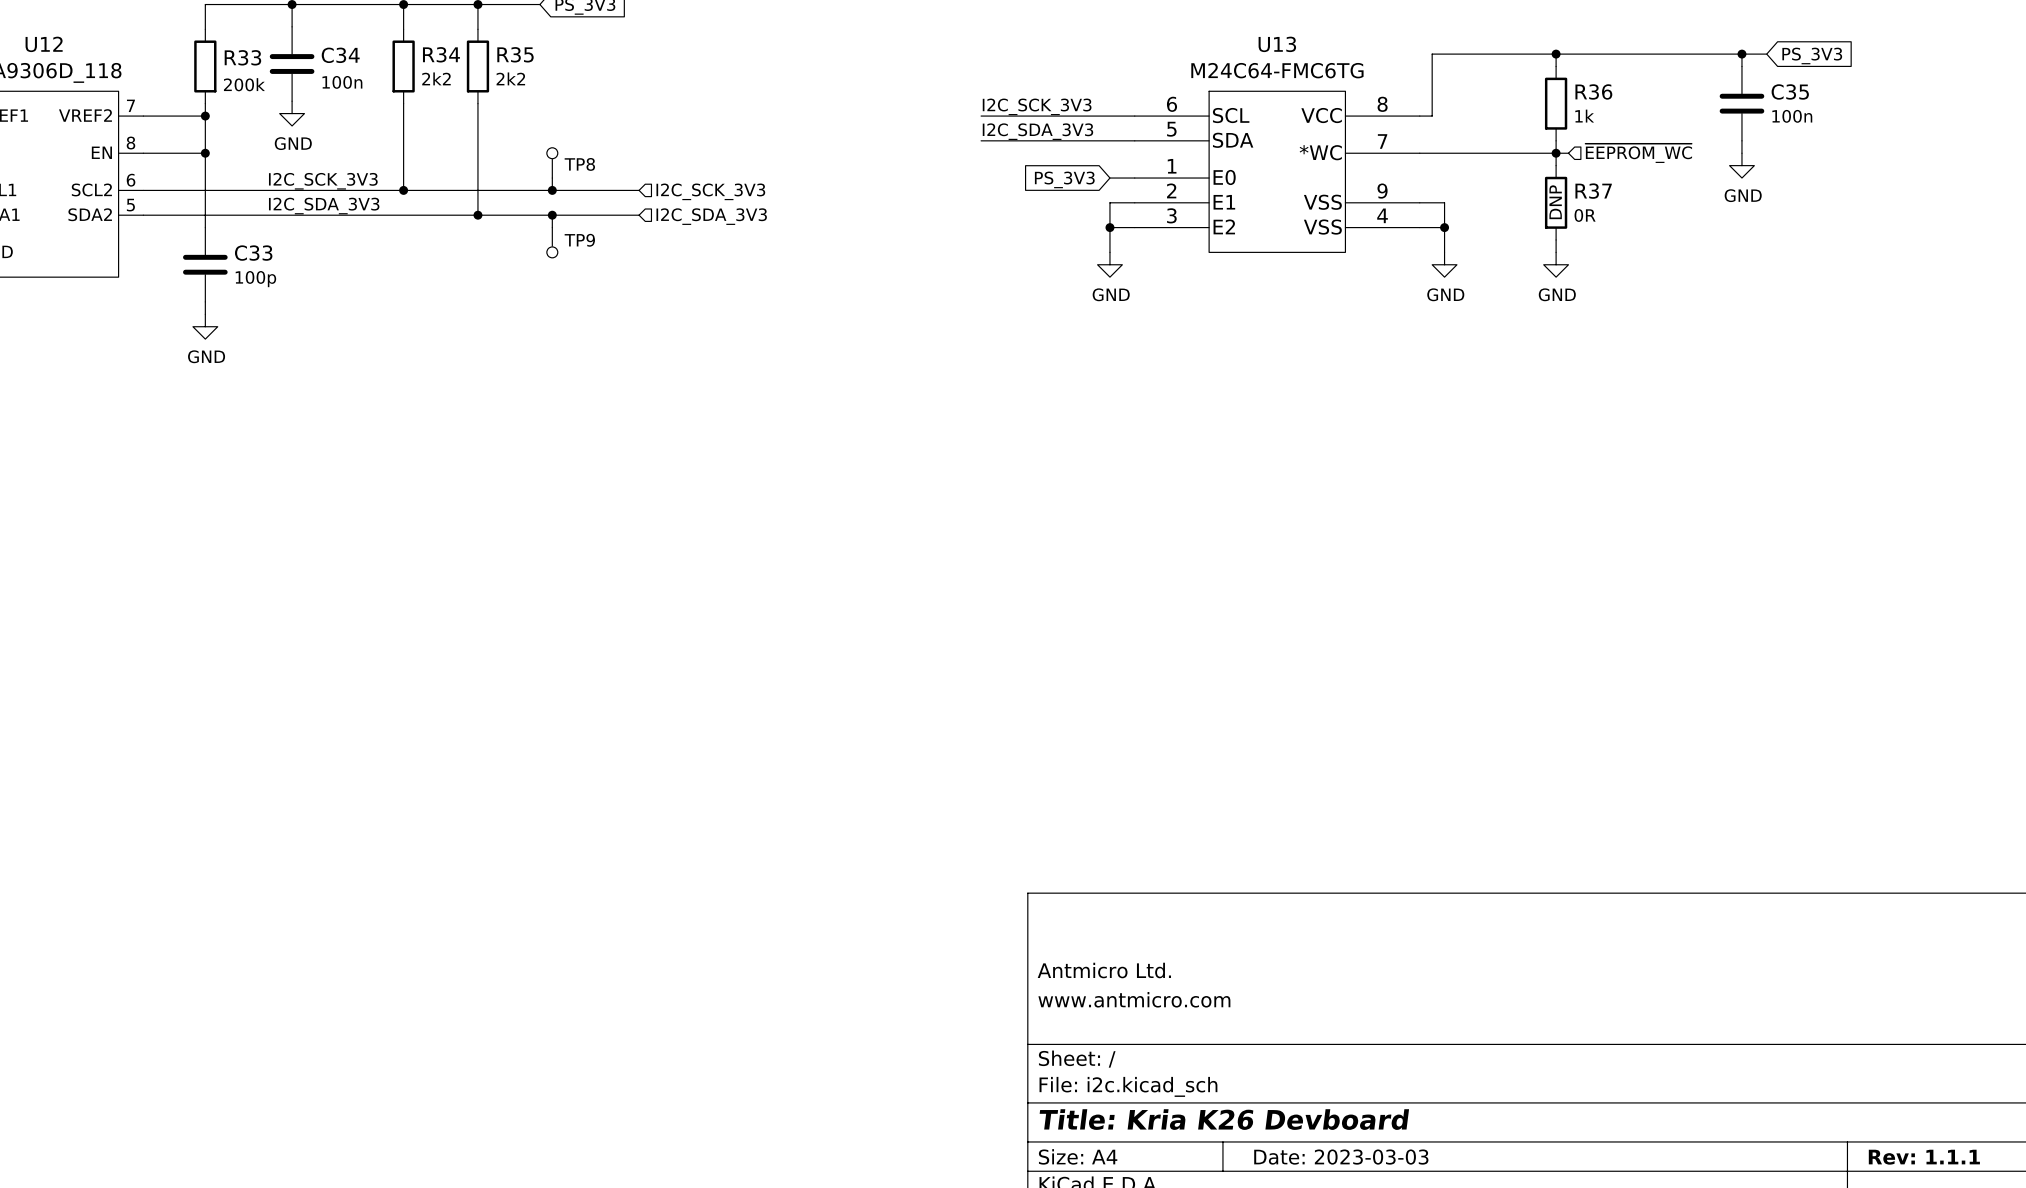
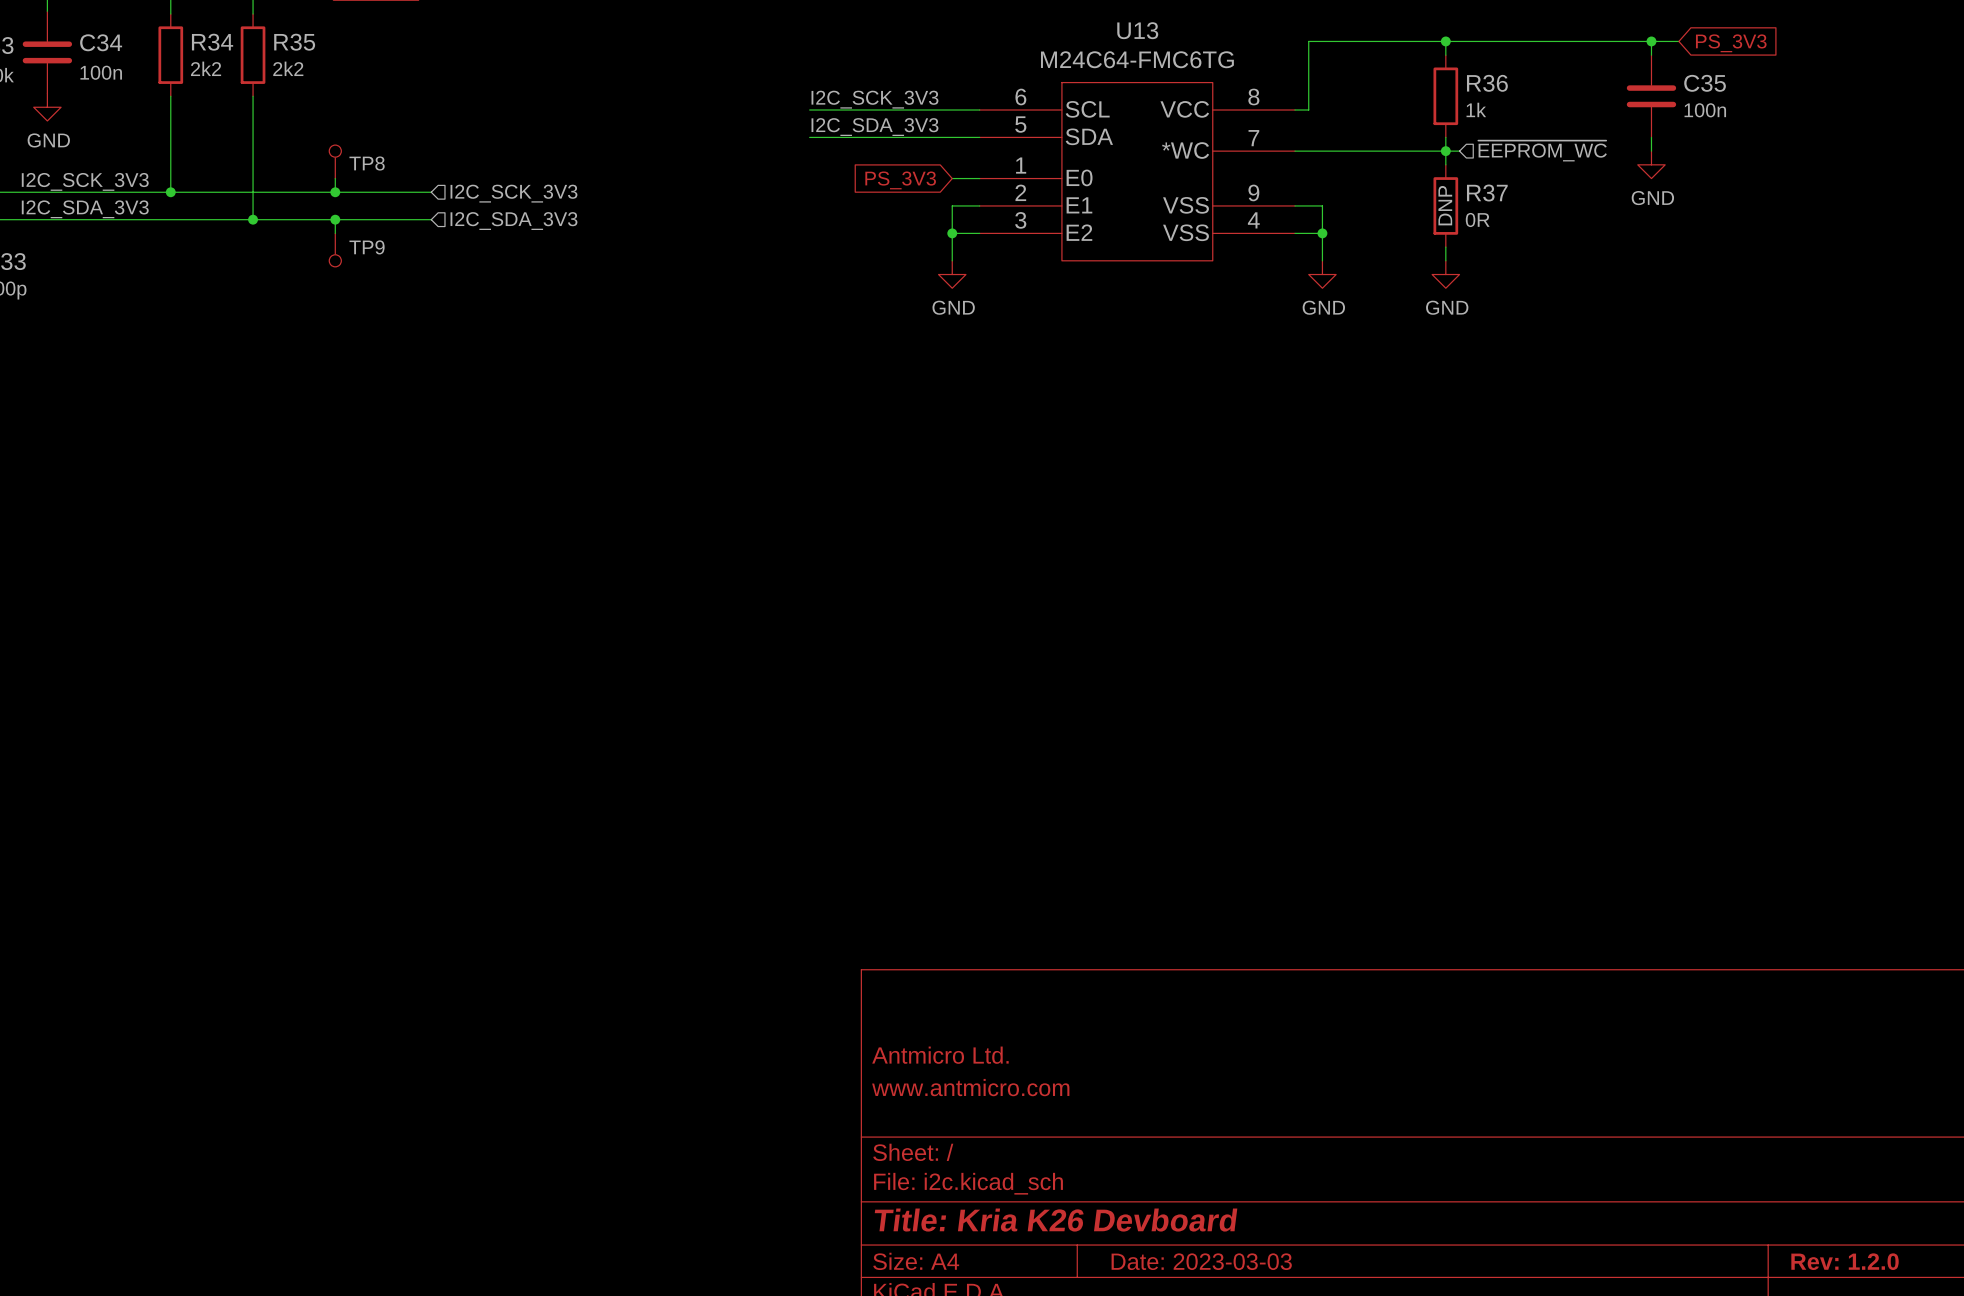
title block: Rev: 1.1.1 (1924, 1157) -> Rev: 1.2.0 (1845, 1261)

